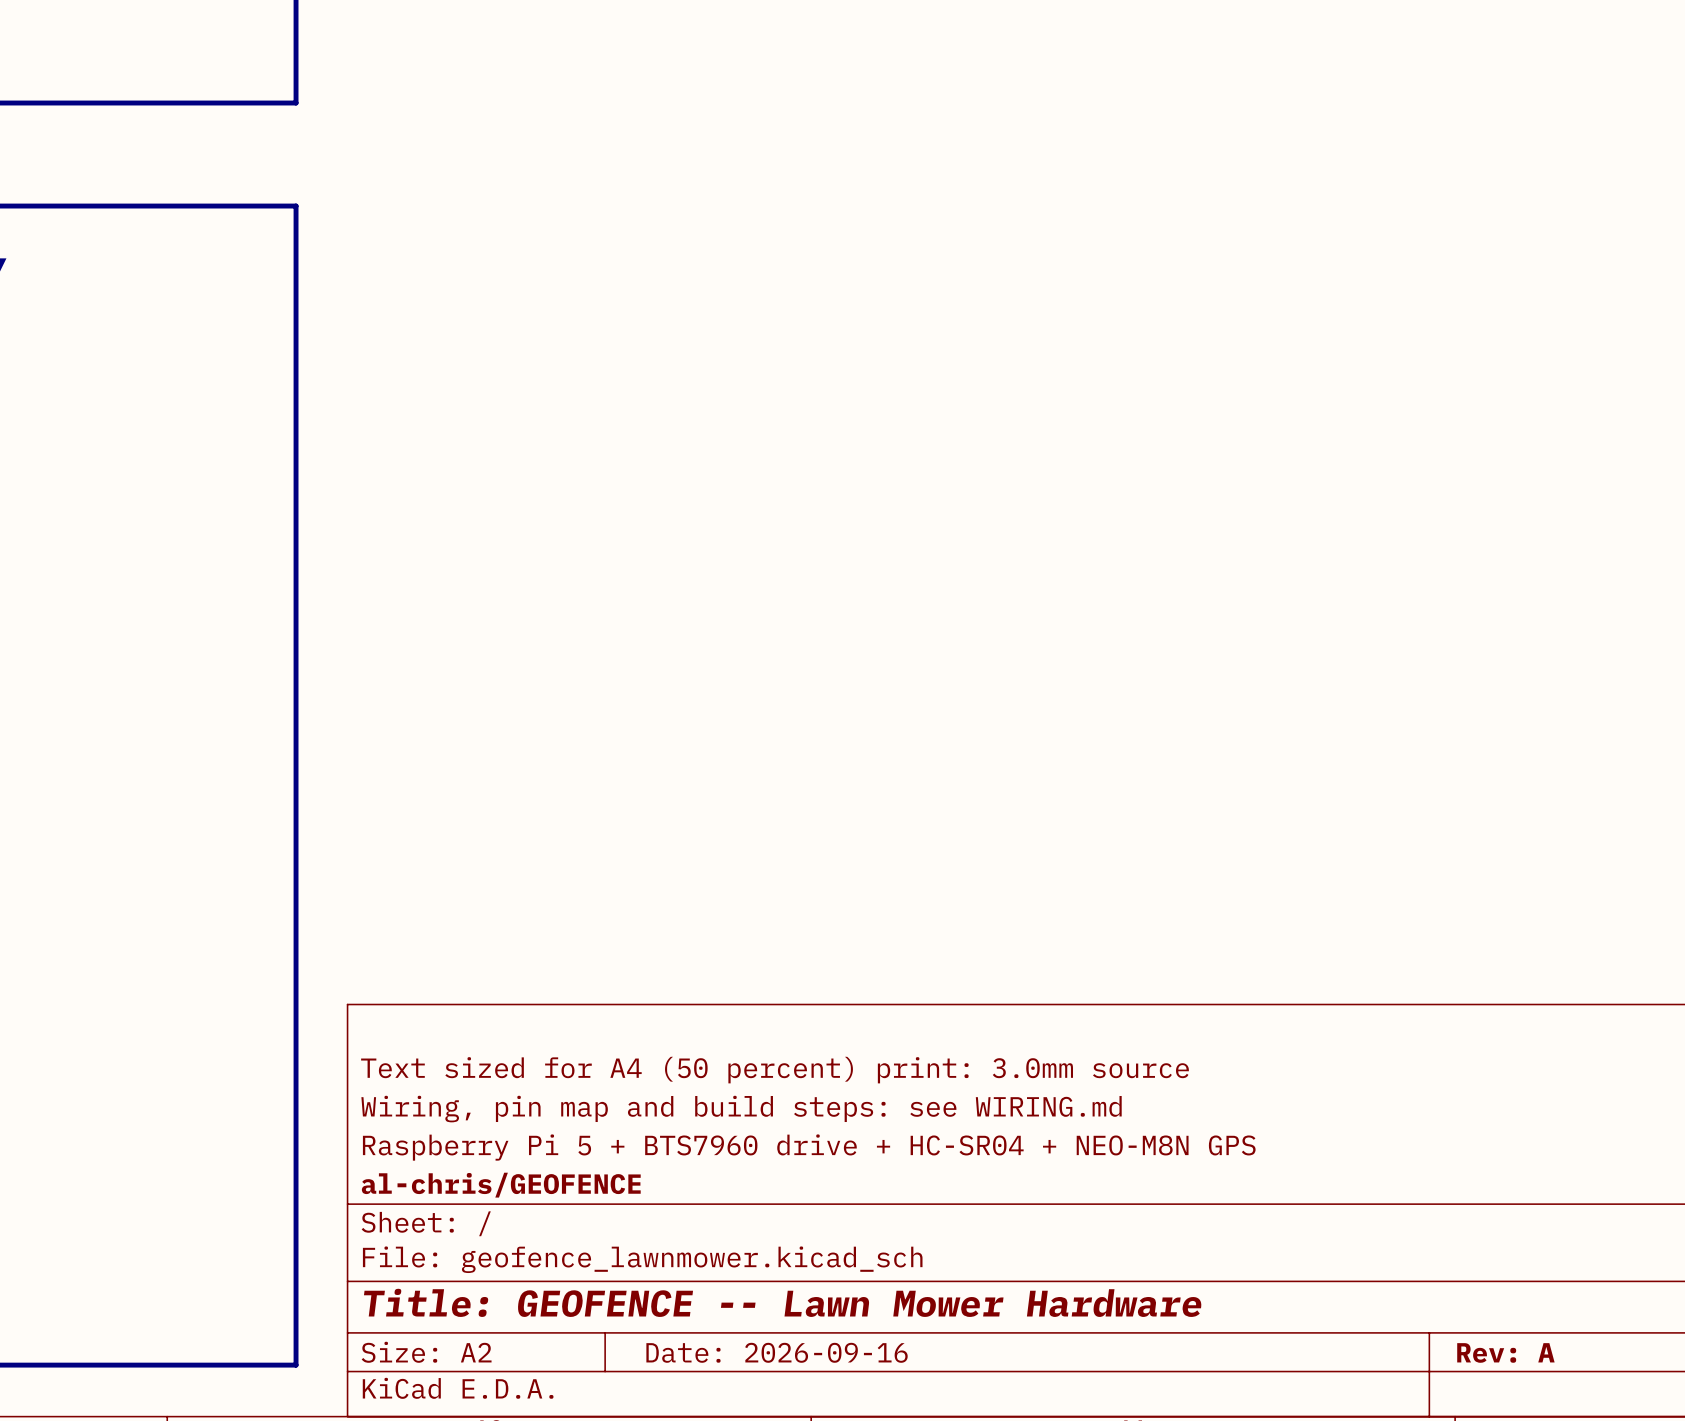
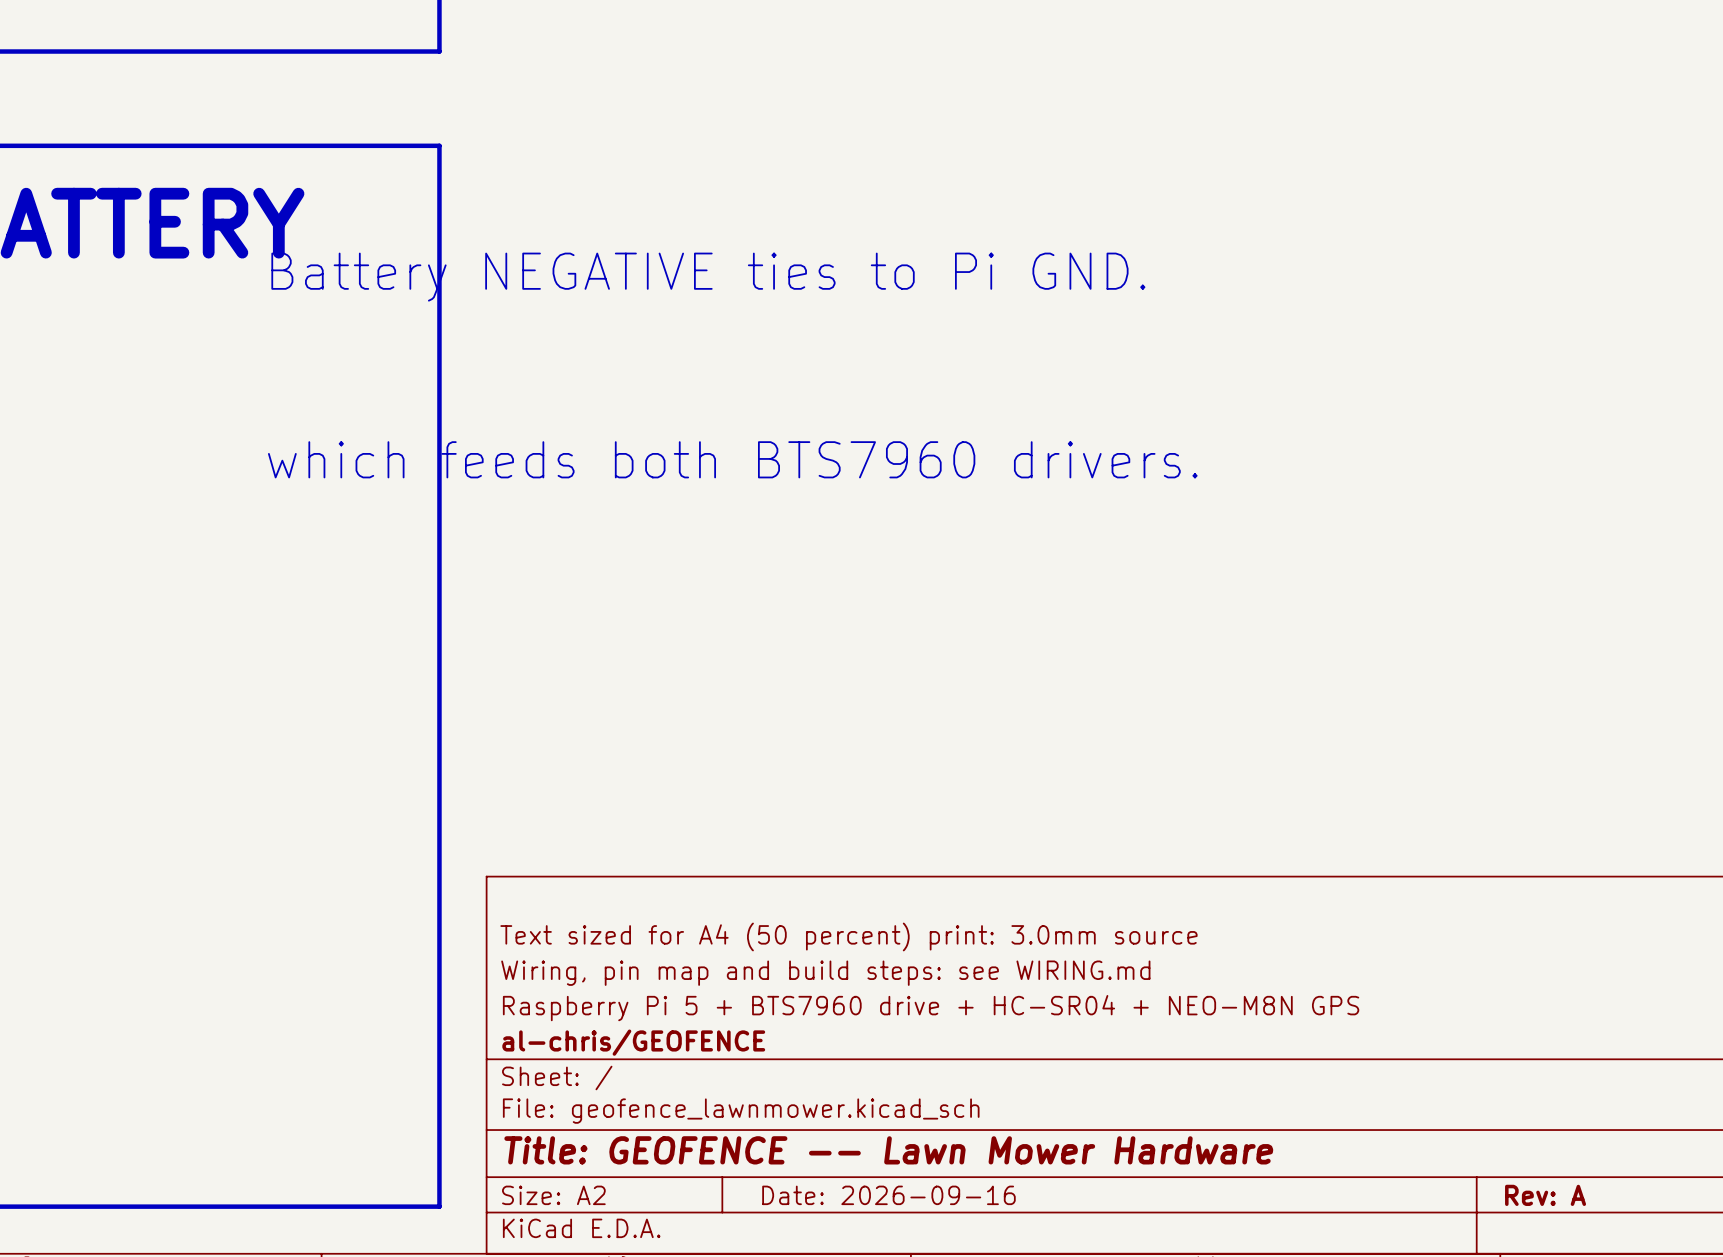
text: none -> Battery NEGATIVE ties to Pi GND. (708, 277)
text: none -> which feeds both BTS7960 drivers. (732, 459)

